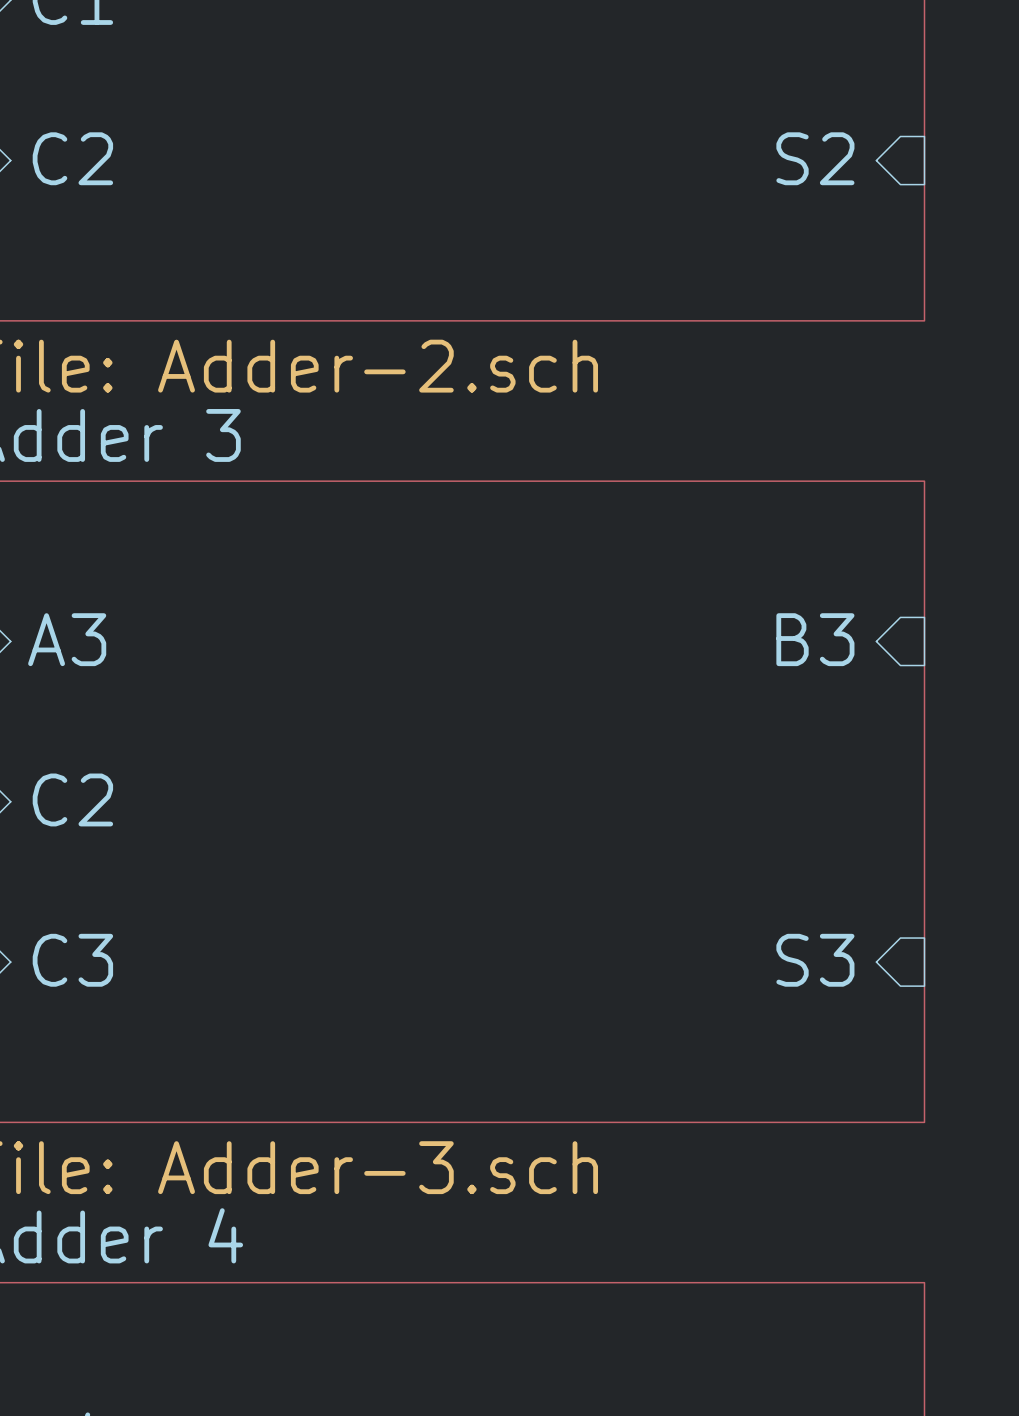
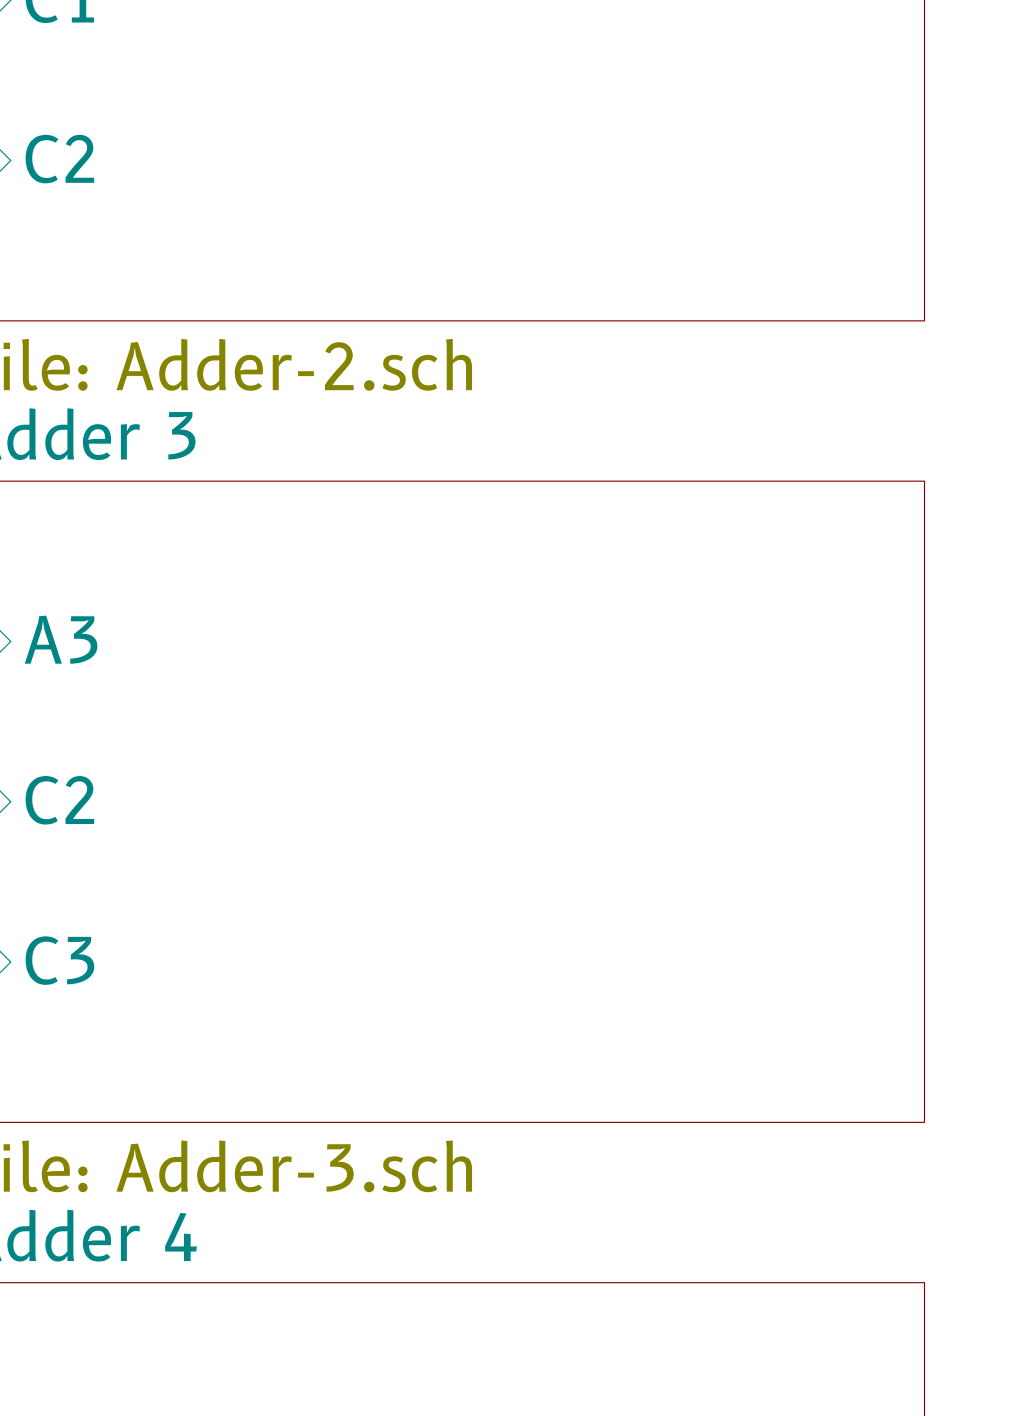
sheet pin: S2 (815, 158) -> none
sheet pin: B3 (815, 639) -> none
sheet pin: S3 (815, 960) -> none

